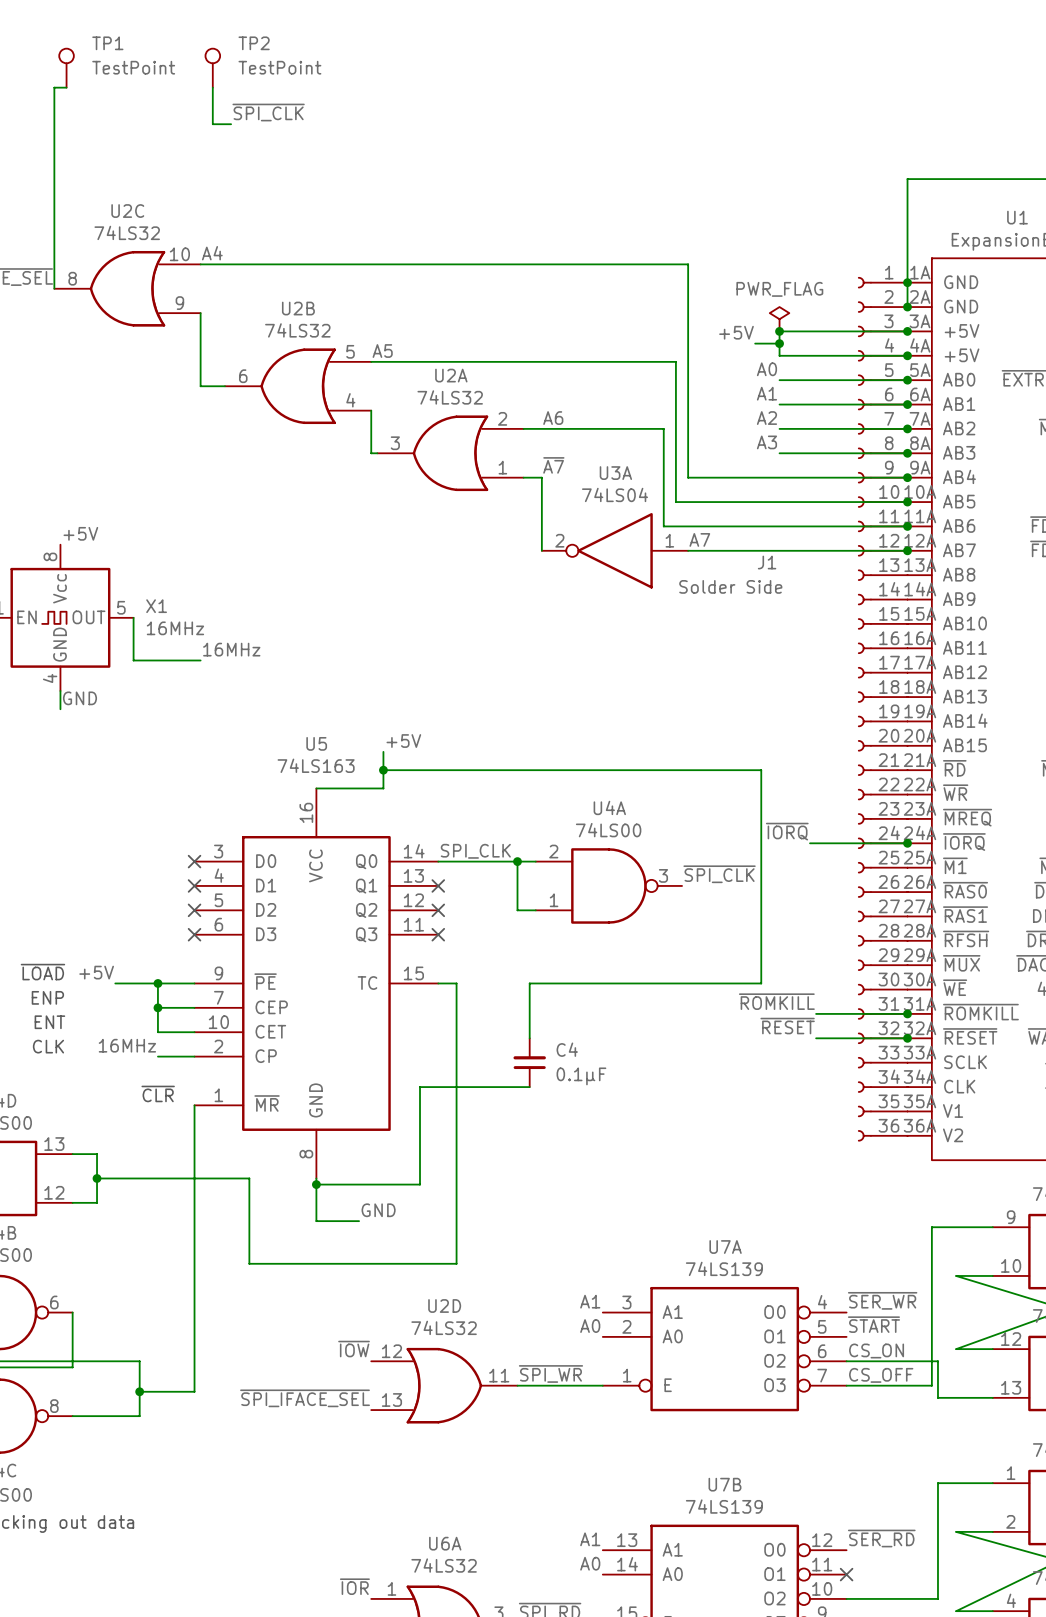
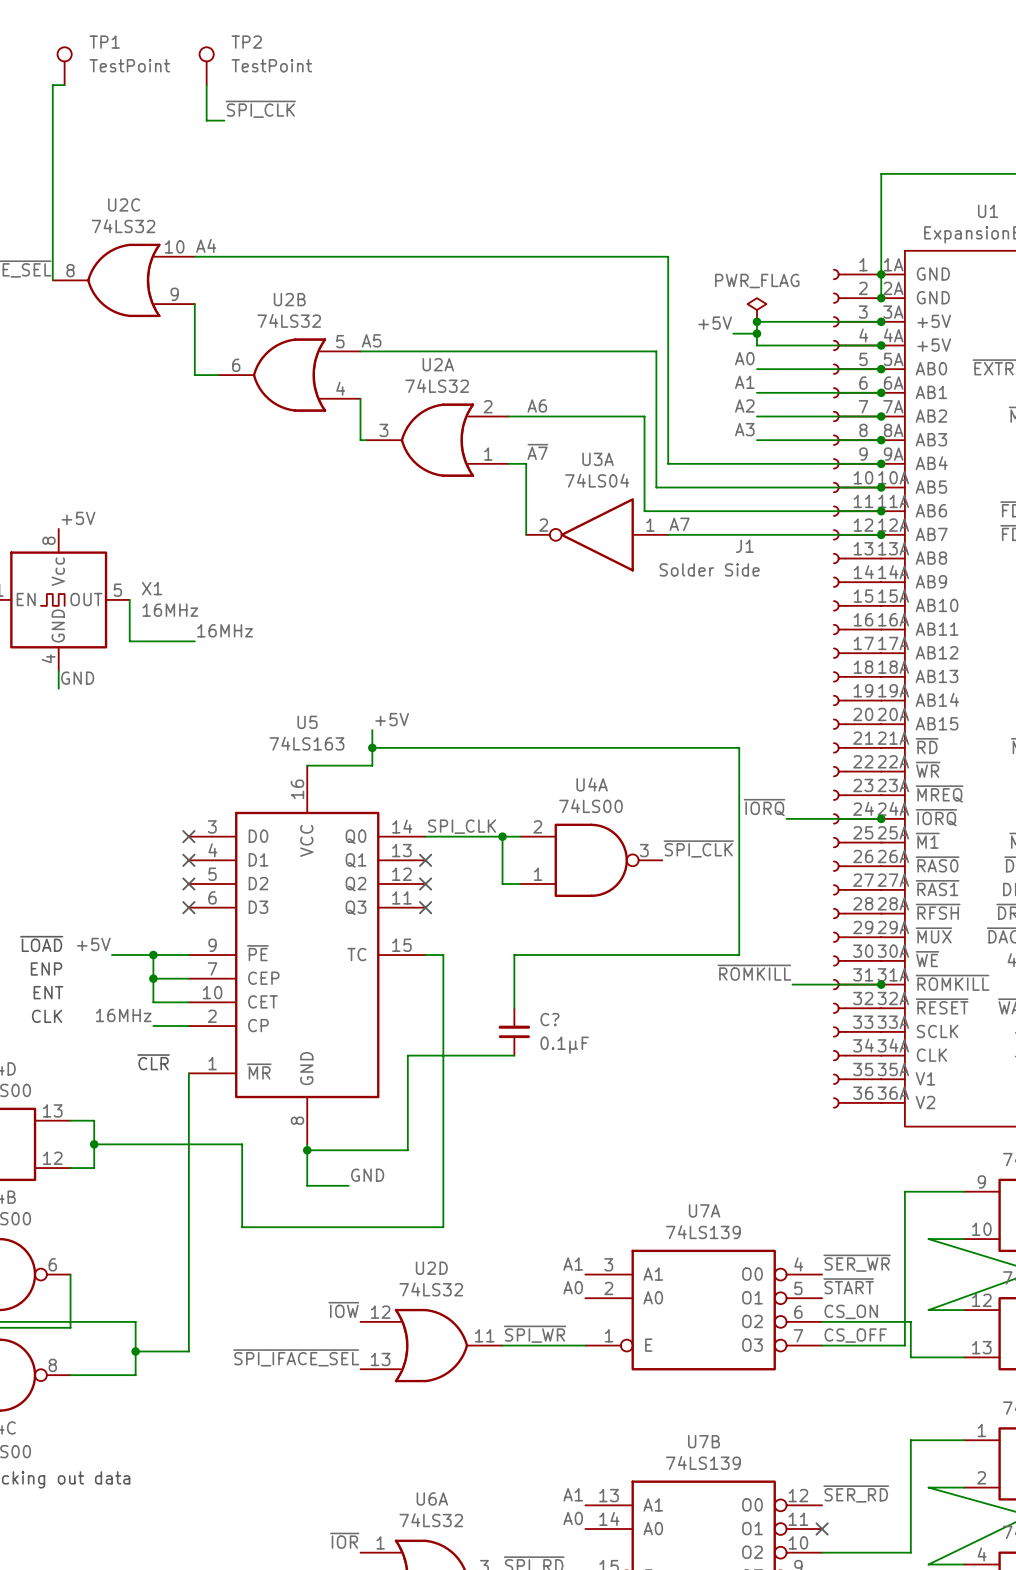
label: ~{RESET} (787, 1026) -> none
wire: (816, 1038) (907, 1038) -> none
junction: (907, 1038) -> none
C4 name: C4 (567, 1049) -> C? (549, 1019)

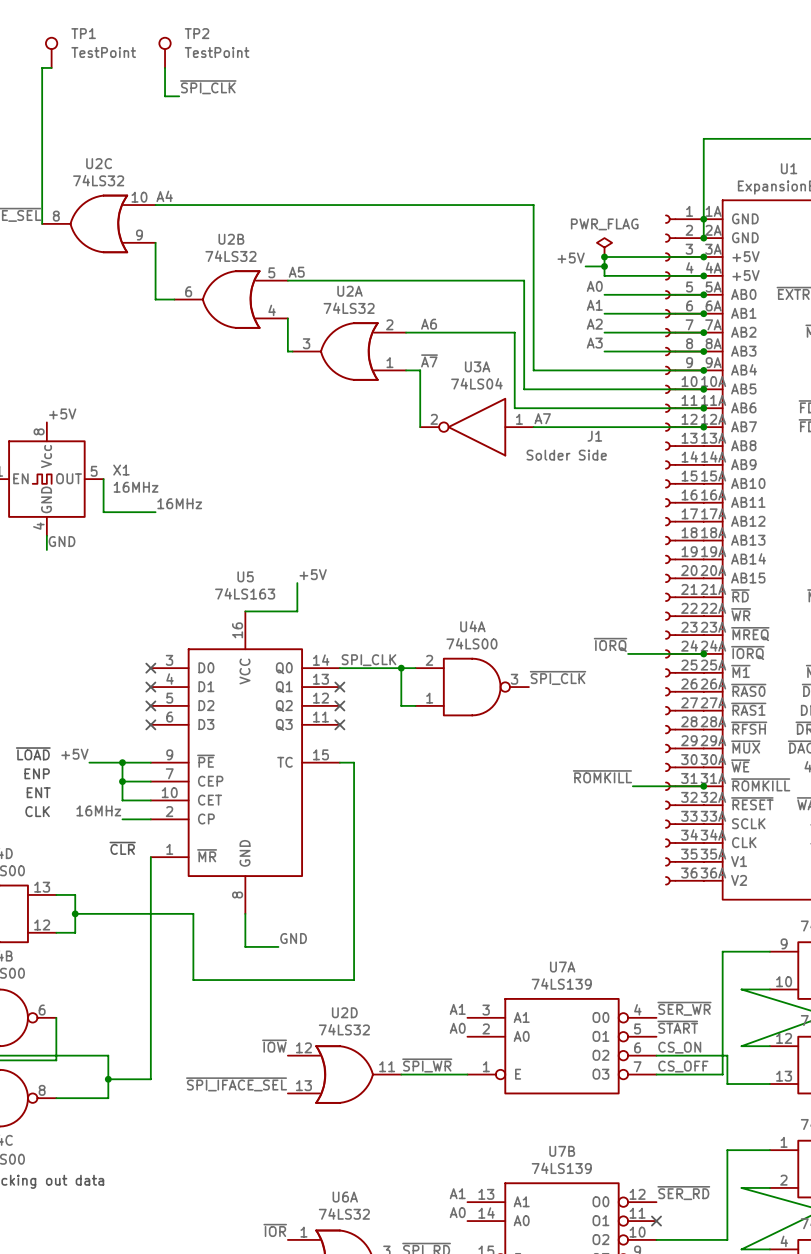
wire: (372, 747) (739, 747) (739, 955) (514, 955) (514, 1008) -> none
junction: (372, 747) -> none
C?: 0.1µF (514, 1031) -> none
wire: (514, 1055) (407, 1055) (407, 1150) (307, 1150) -> none
junction: (307, 1150) -> none

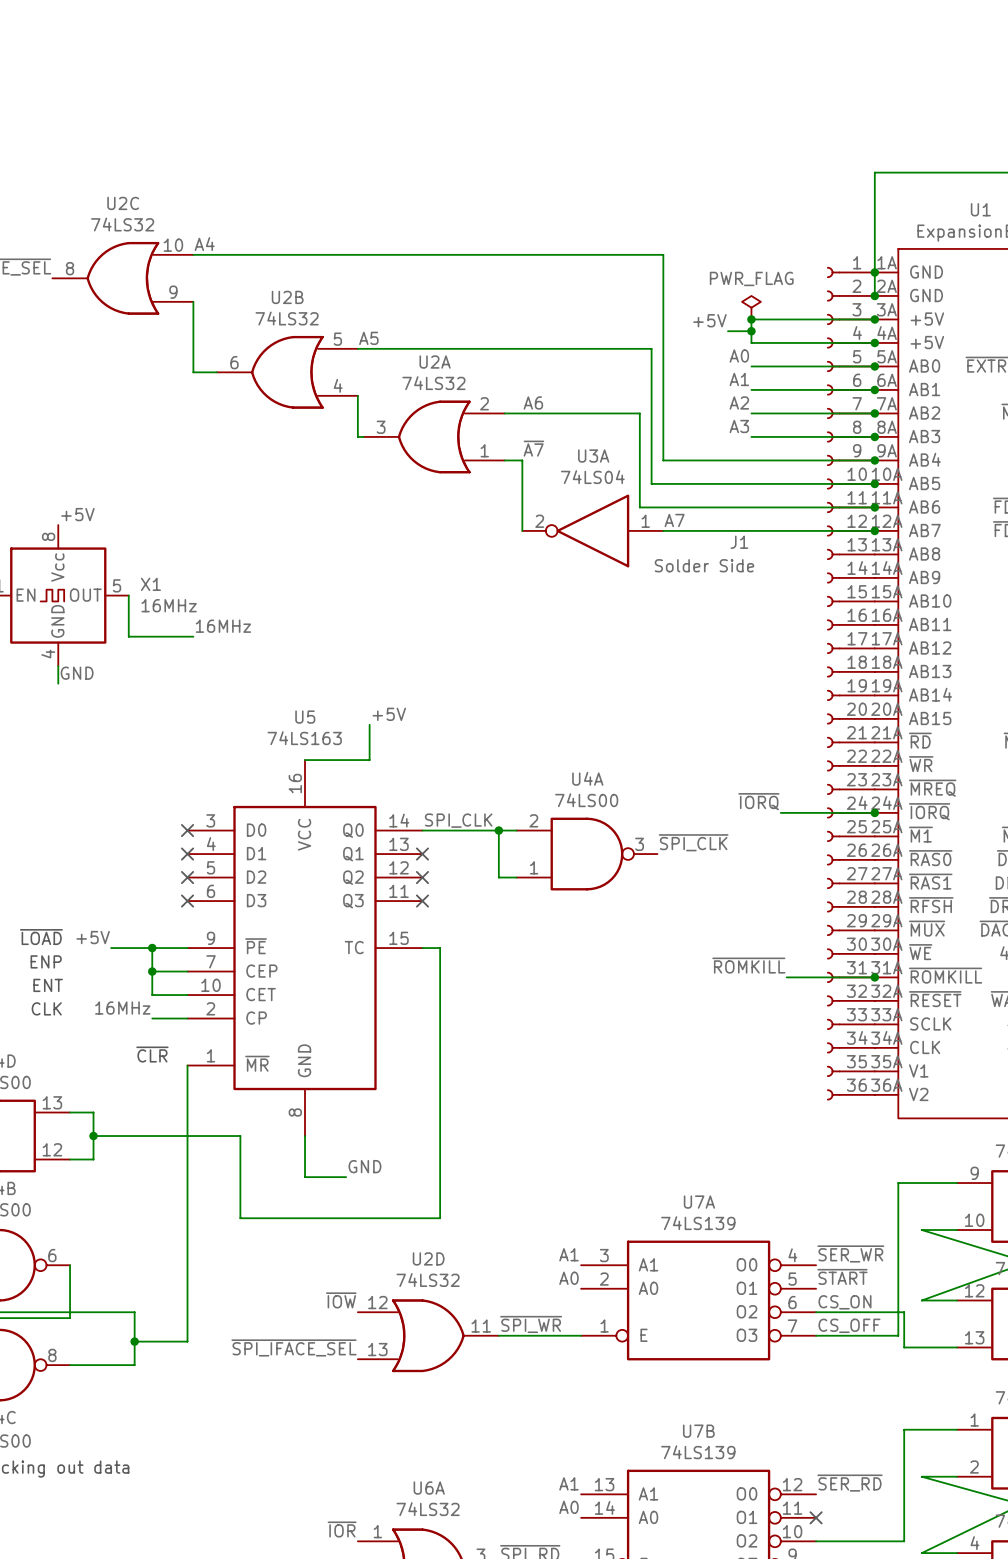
TP1: TestPoint (51, 52) -> none
TP2: TestPoint (165, 52) -> none
wire: (51, 67) (42, 67) (42, 223) -> none
wire: (165, 67) (165, 96) (179, 96) -> none
label: ~{SPI_CLK} (208, 87) -> none

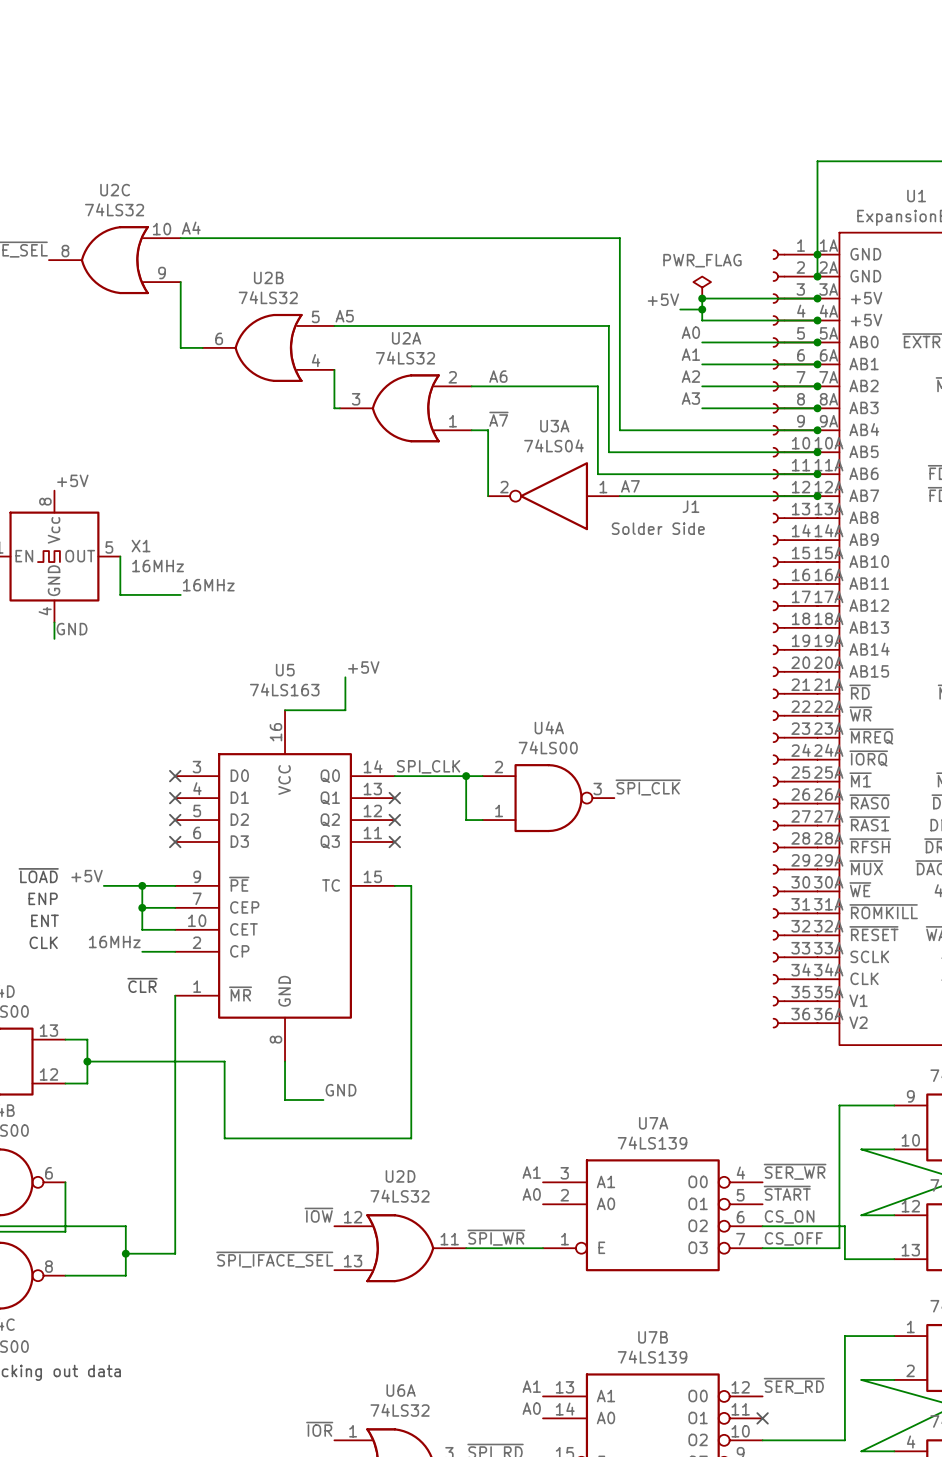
label: ~{IORQ} (758, 801) -> none
wire: (780, 812) (874, 812) -> none
junction: (874, 812) -> none
label: ~{ROMKILL} (748, 965) -> none
wire: (786, 977) (874, 977) -> none
junction: (874, 977) -> none

